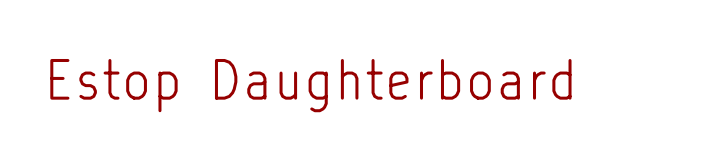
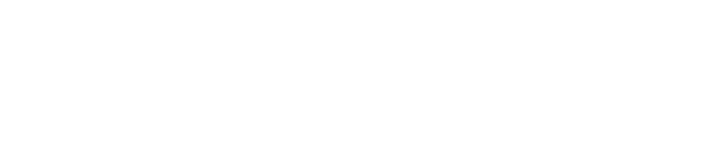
text: Estop Daughterboard (310, 85) -> none

